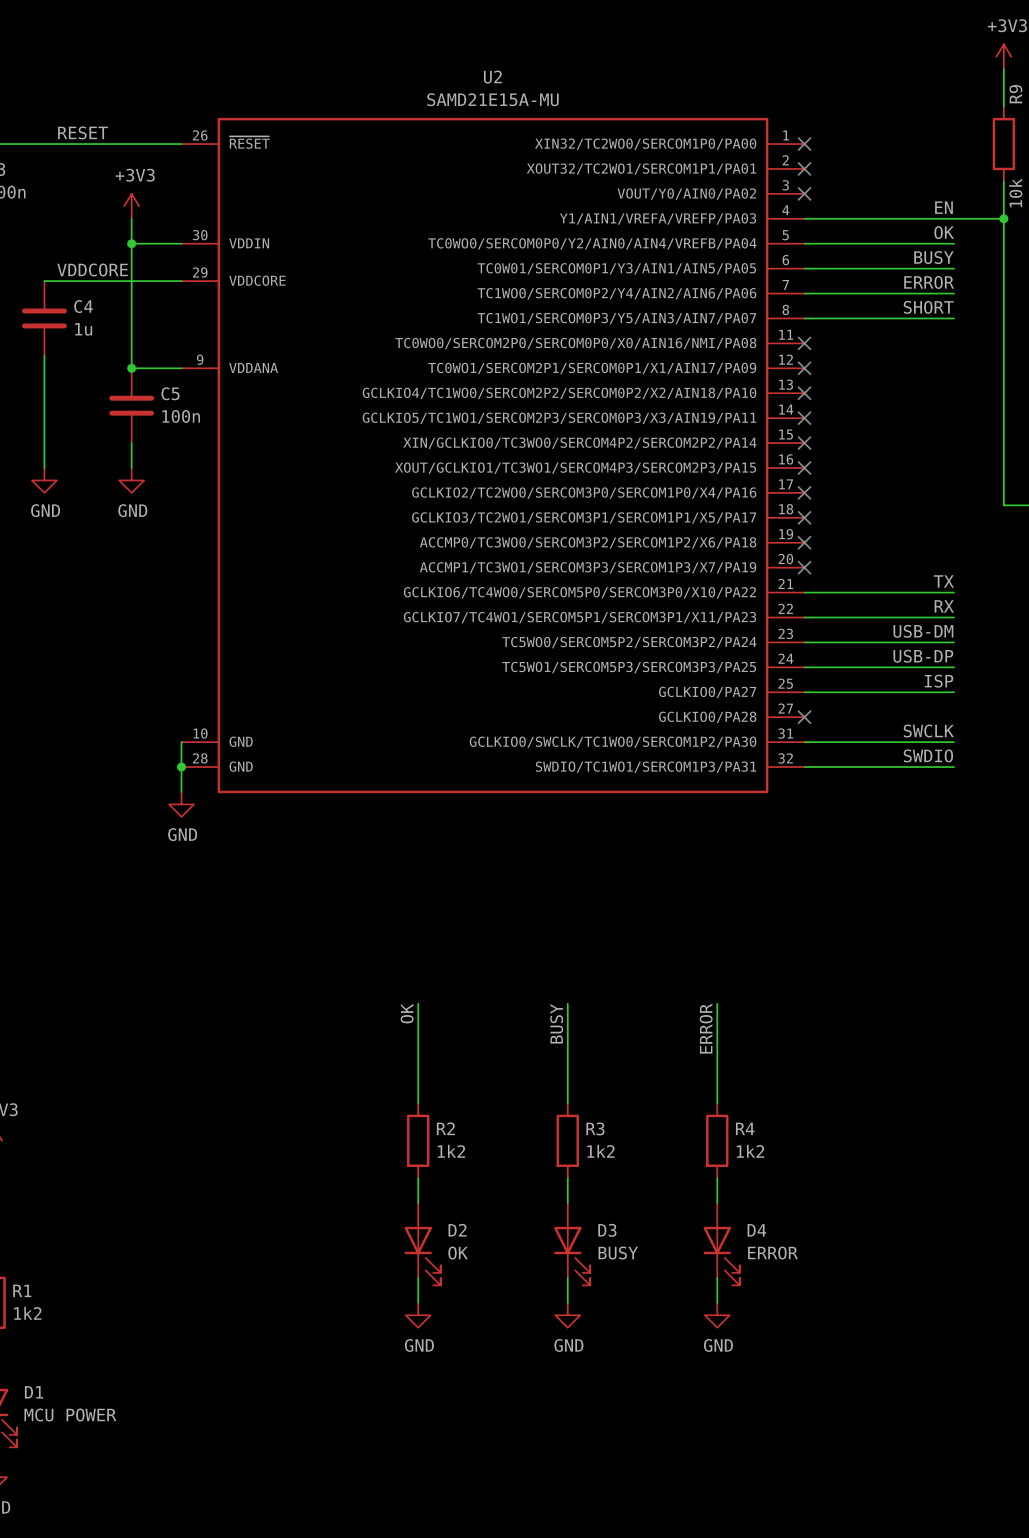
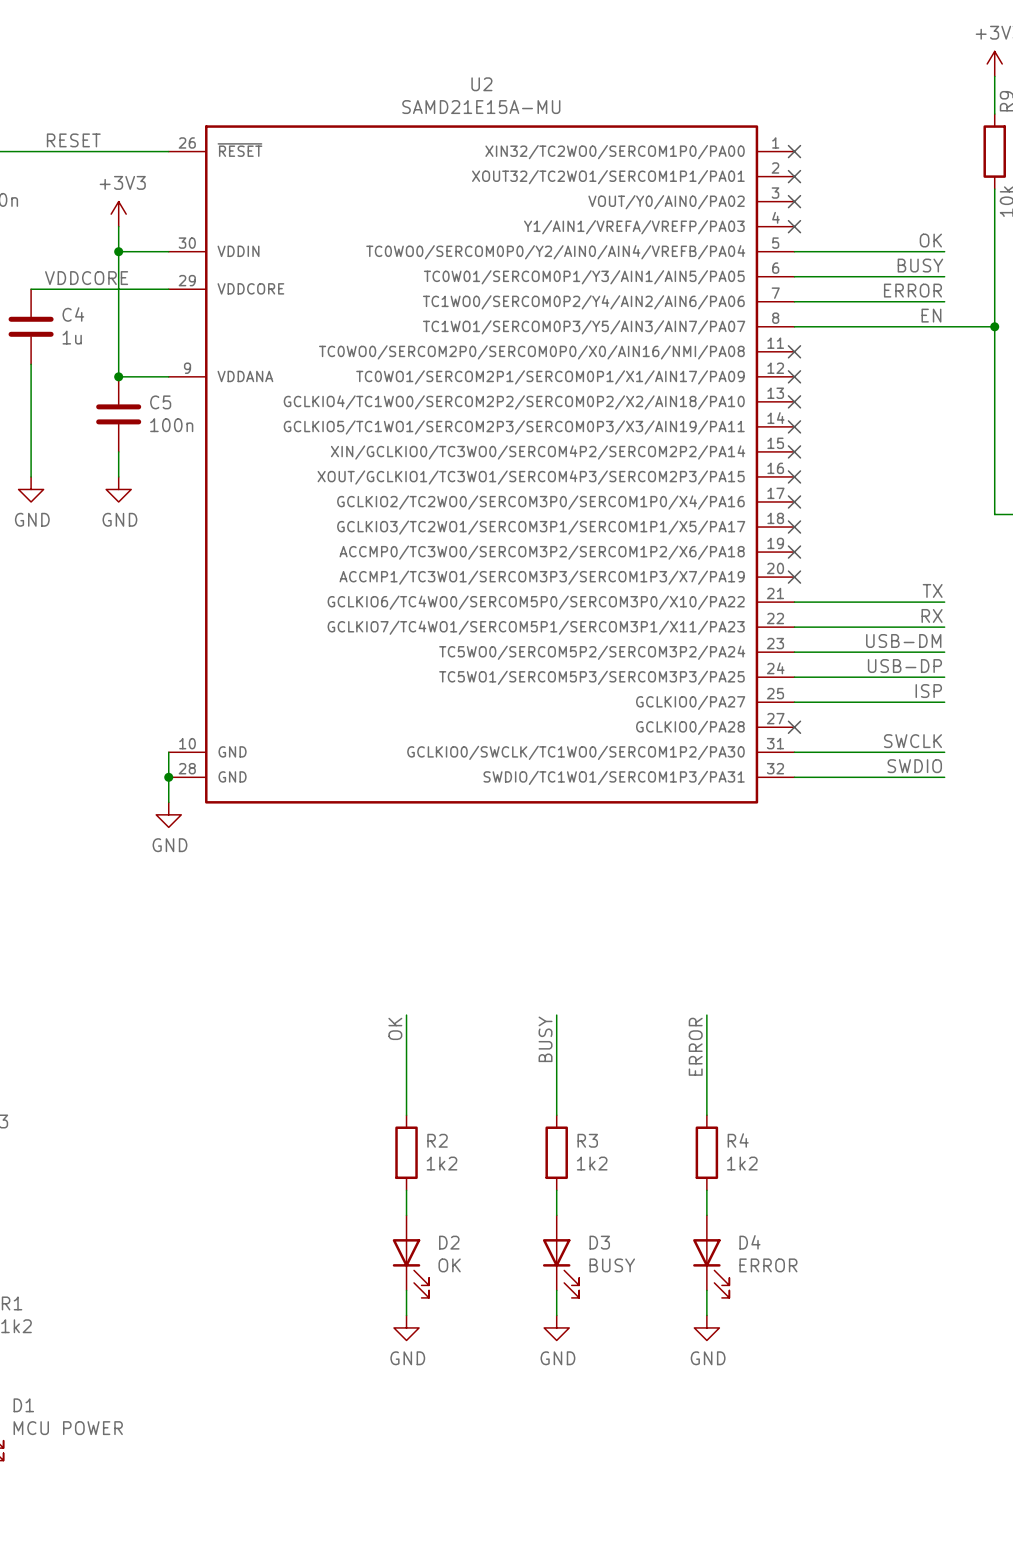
label: EN (943, 207) -> none
wire: (804, 218) (1003, 218) -> none
no-connect mark: none -> (794, 226)
junction: (1003, 218) -> none
label: SHORT (928, 307) -> EN (931, 315)
wire: none -> (944, 326) (994, 326)
junction: none -> (994, 326)

